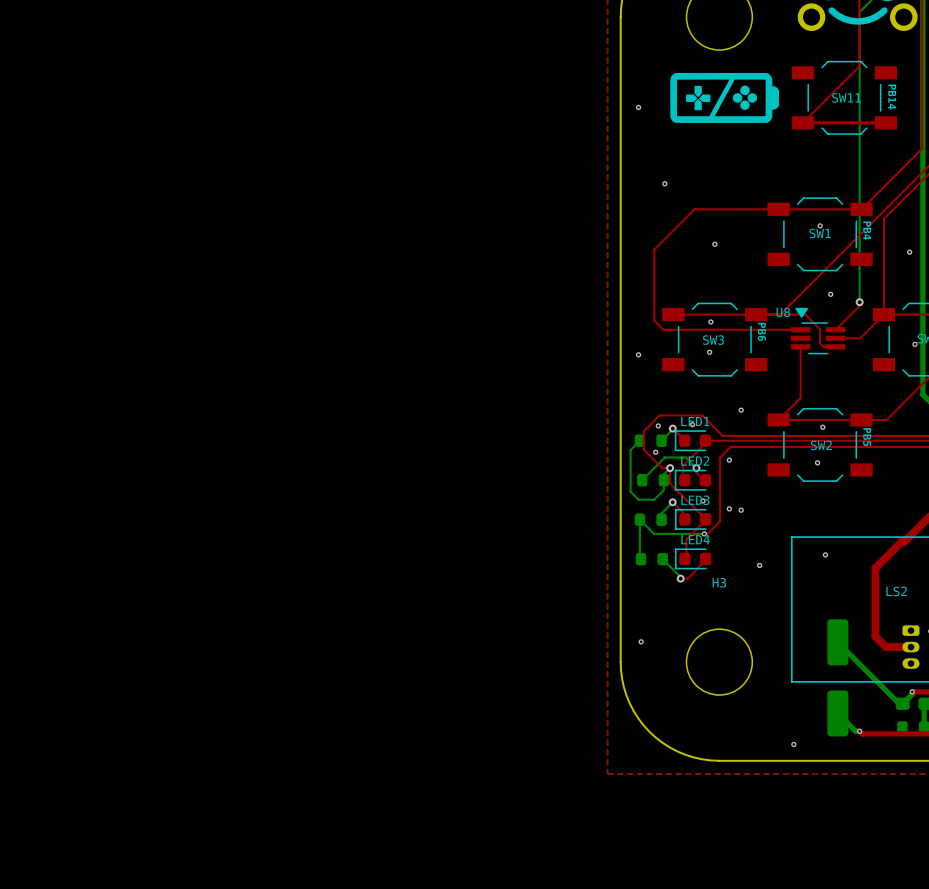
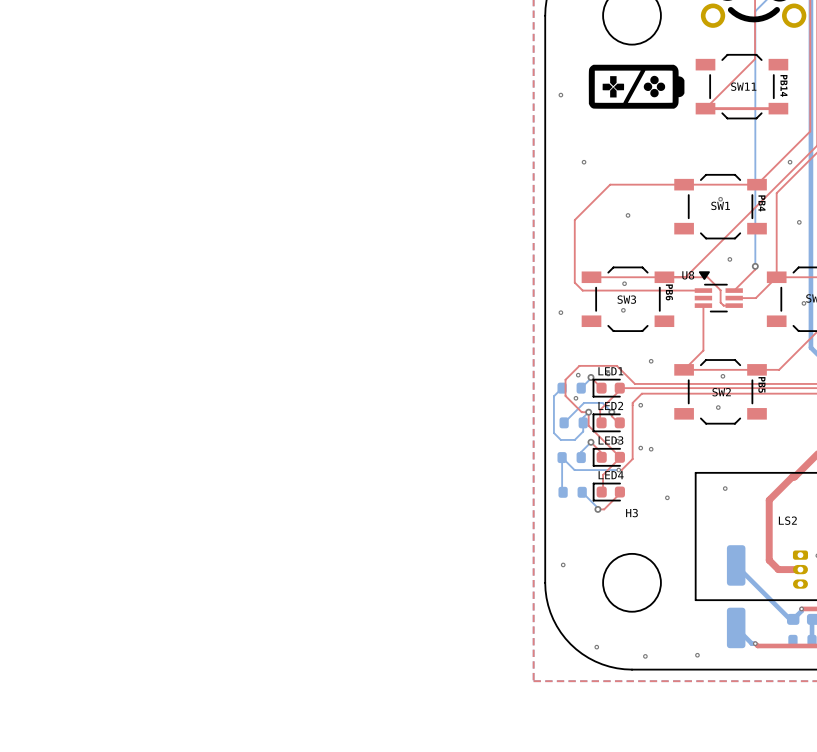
via: none -> (790, 162)
via: none -> (596, 647)
via: none -> (645, 656)

